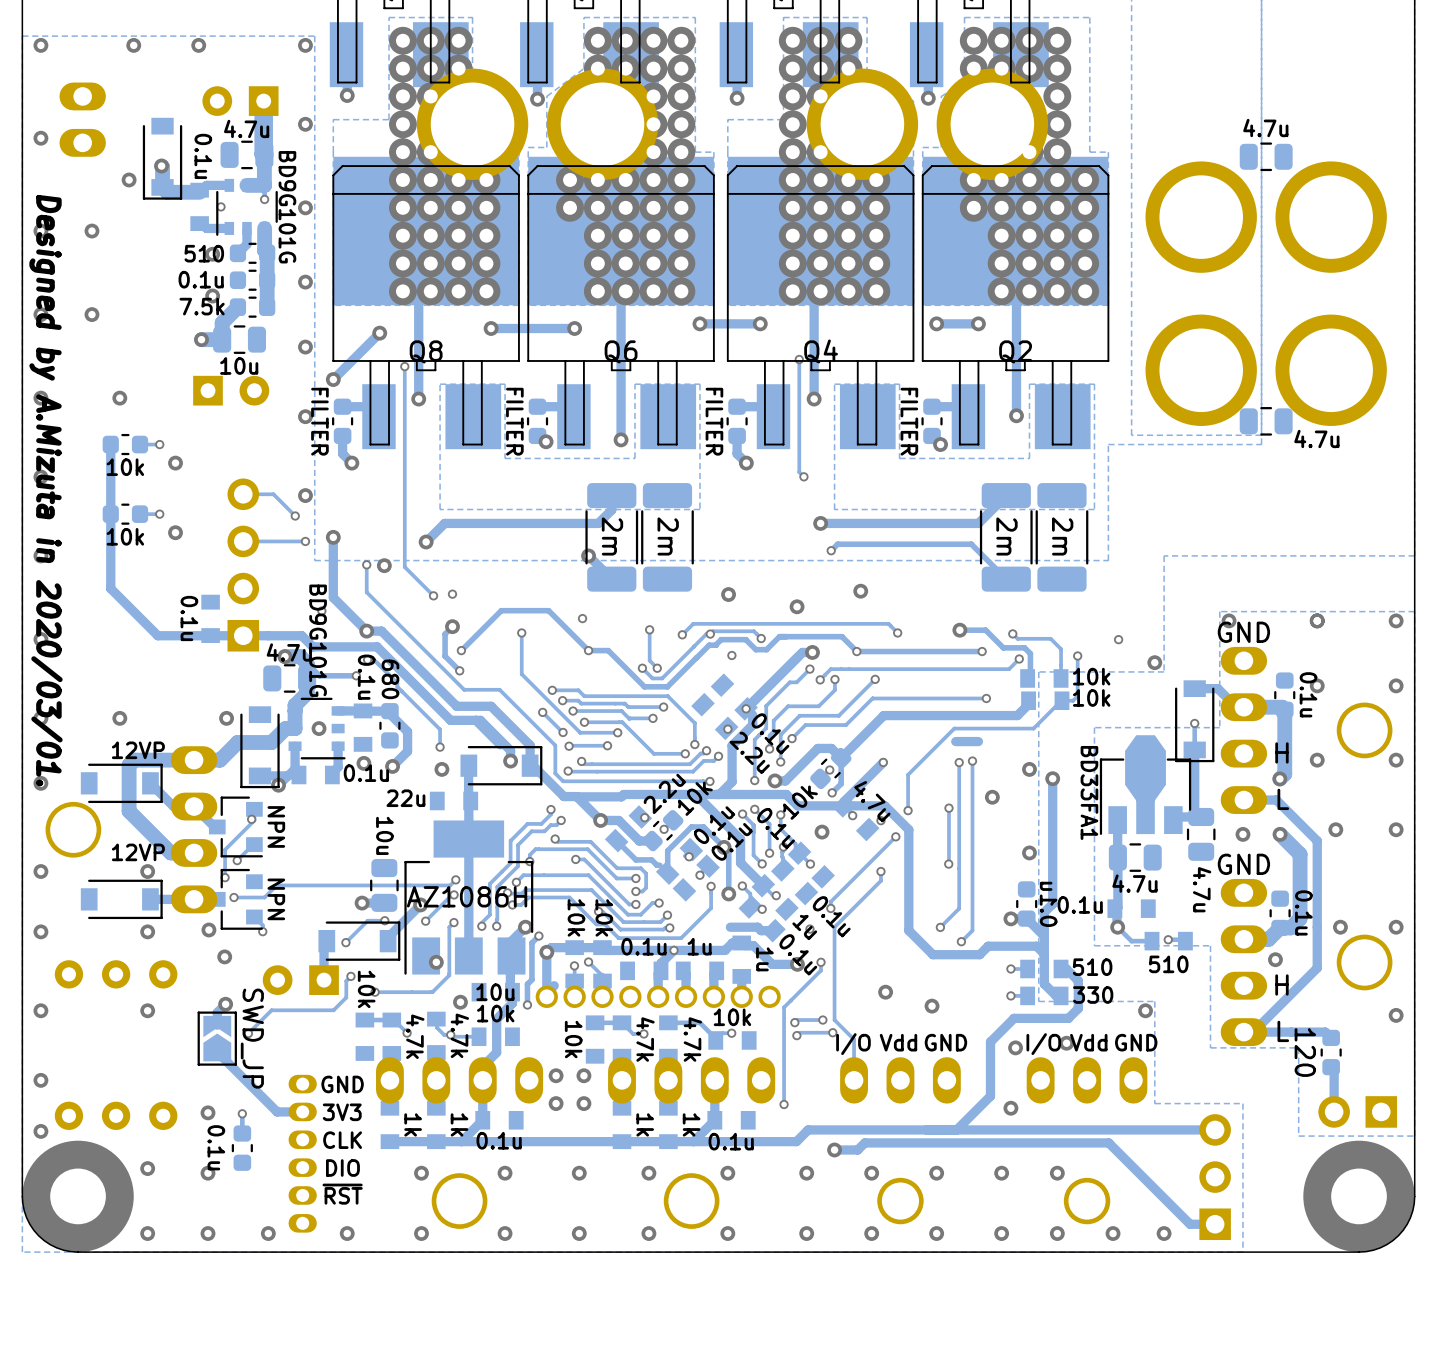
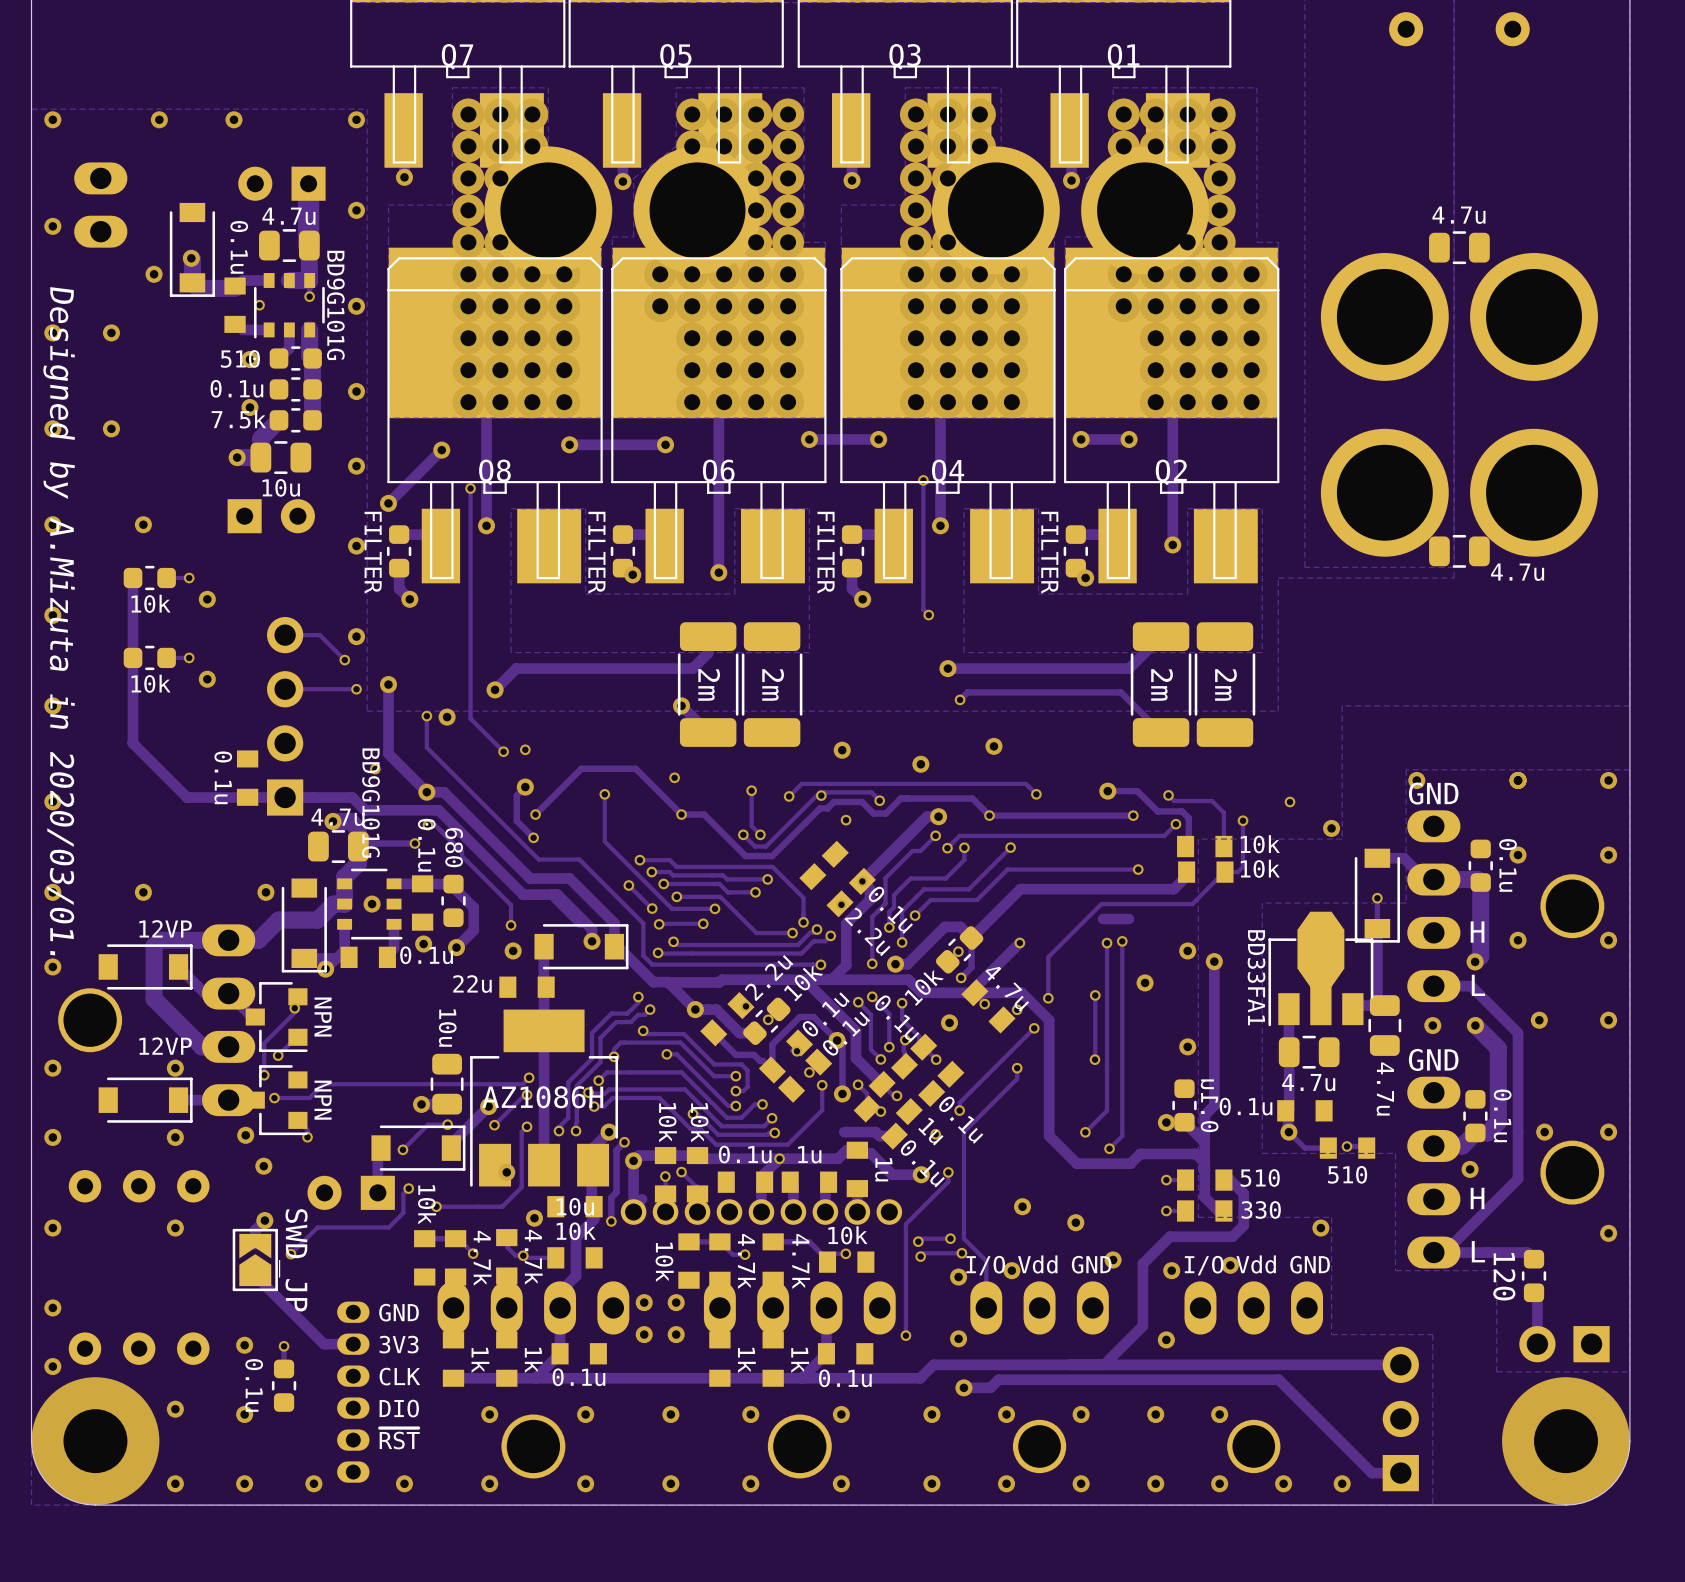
via: none -> (1113, 1259)
via: none -> (1011, 1270)
via: none -> (958, 1277)
via: none -> (958, 1338)

